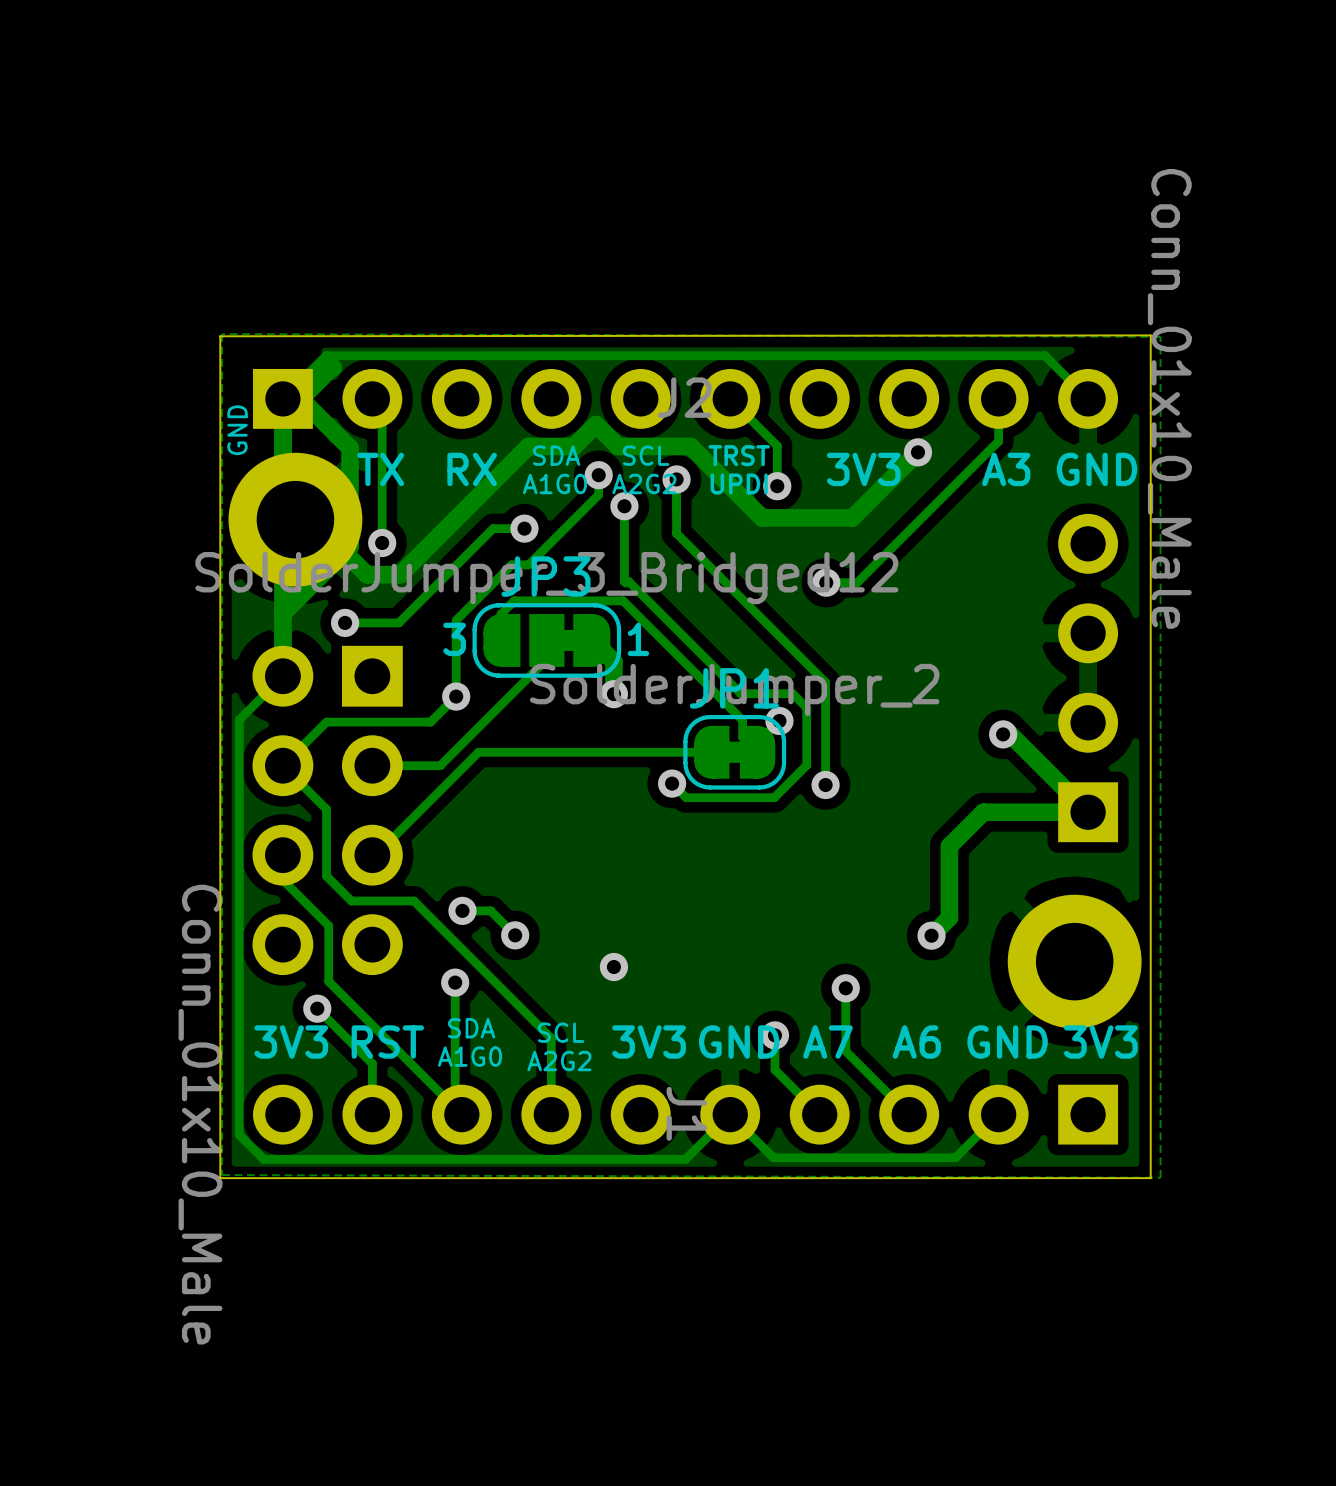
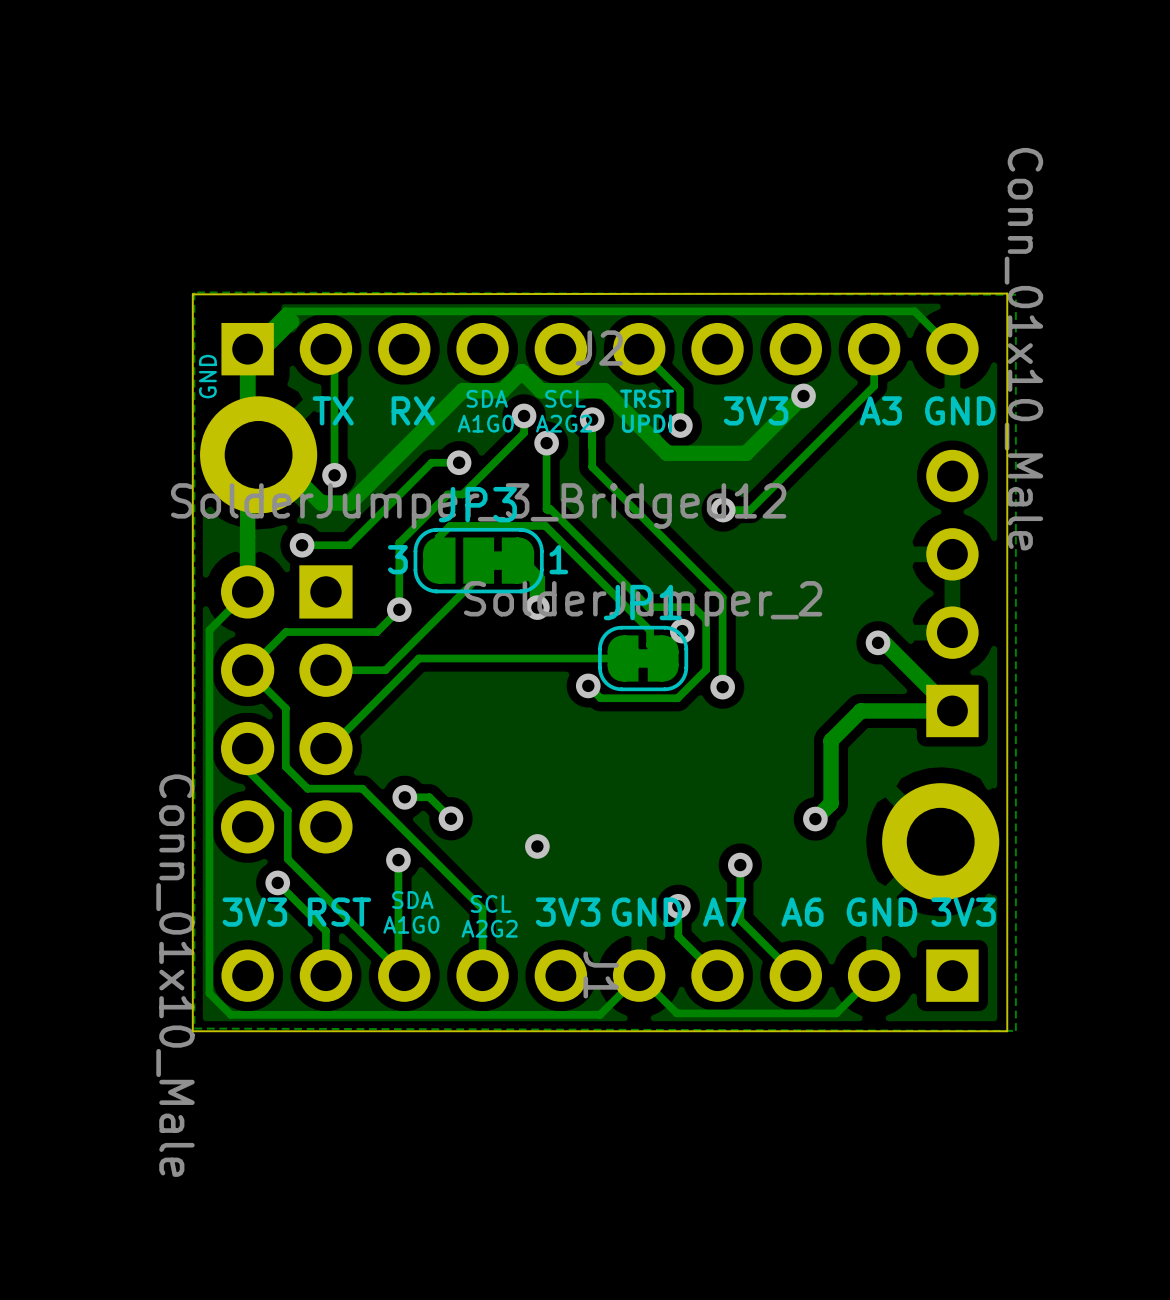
track: (300, 398) (350, 448) (350, 546) (282, 613) -> none

